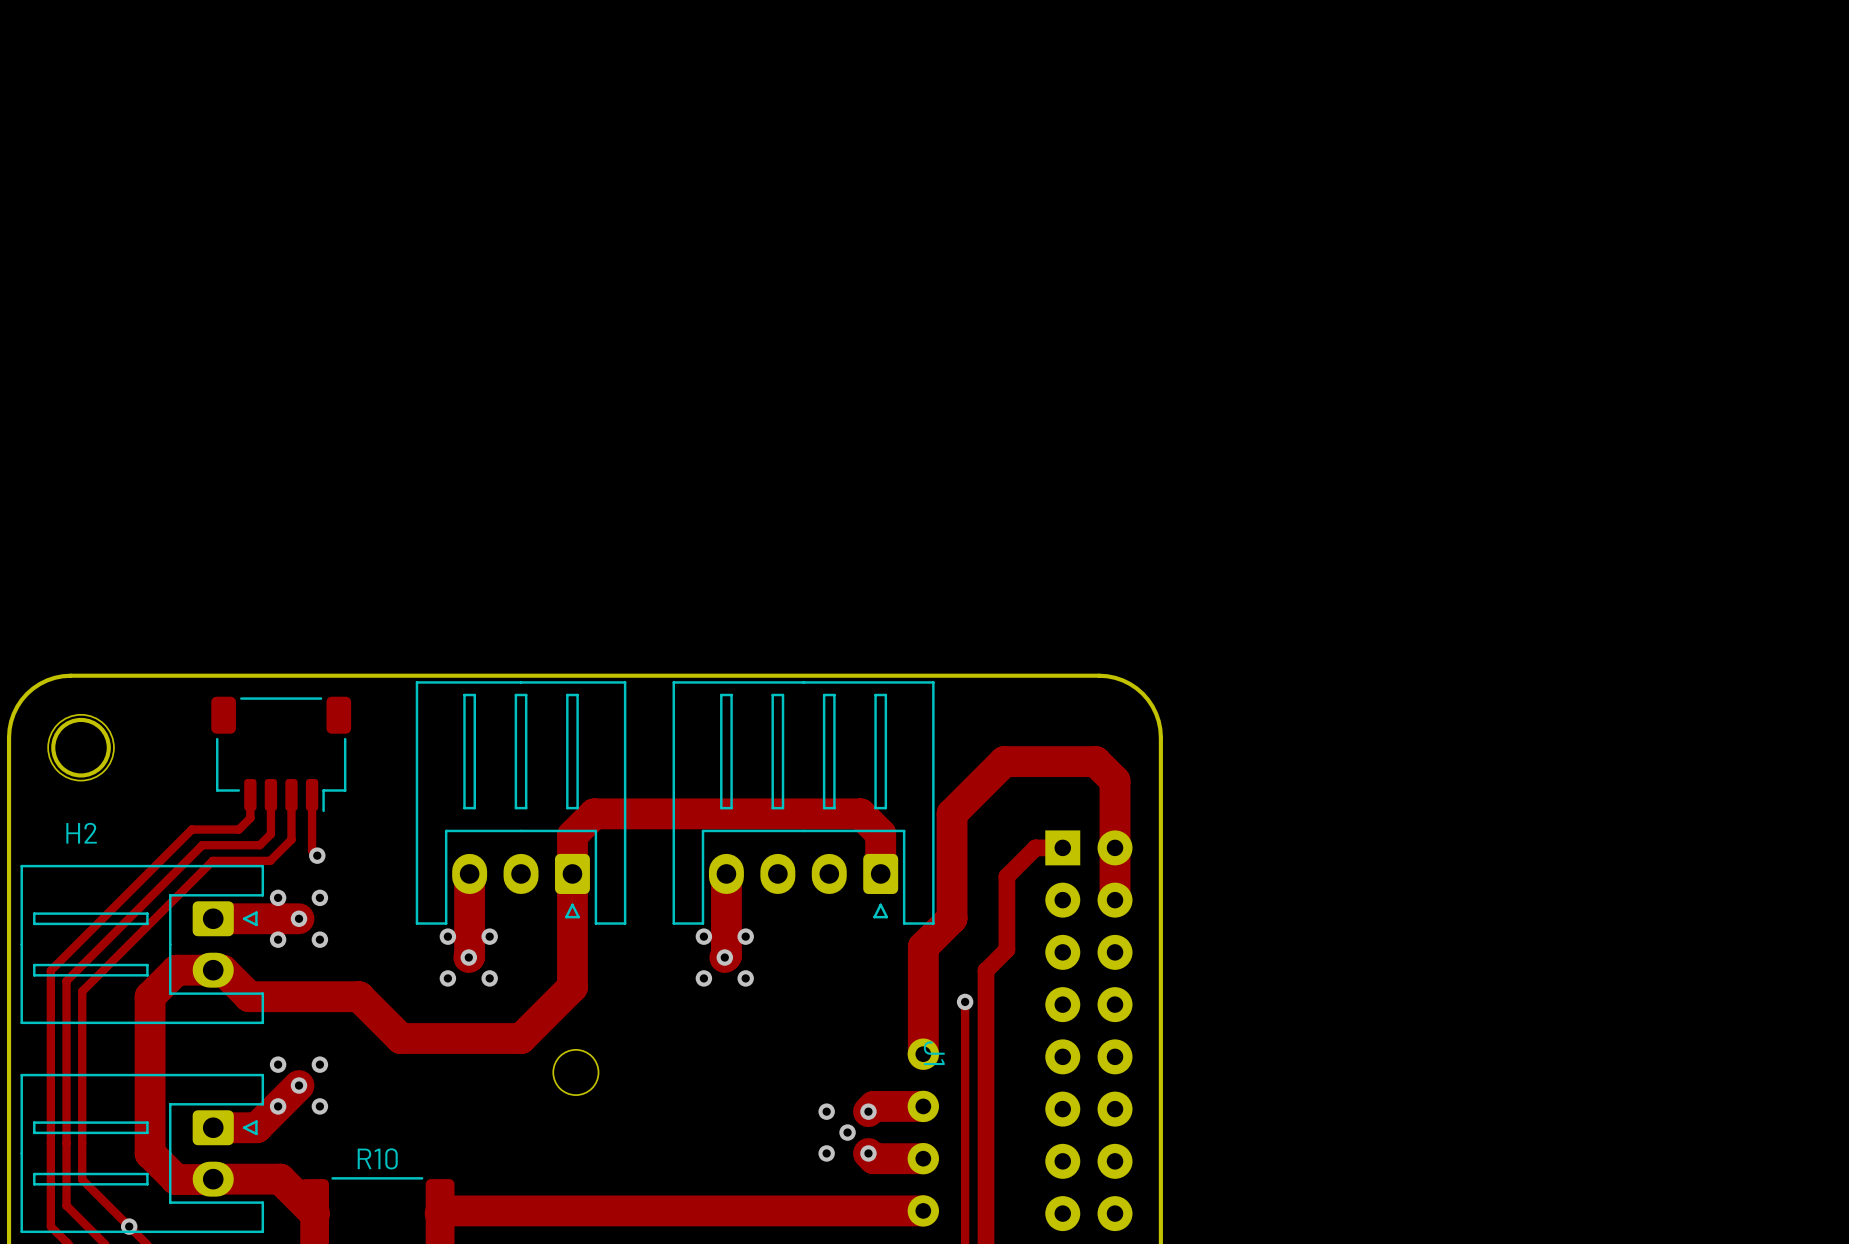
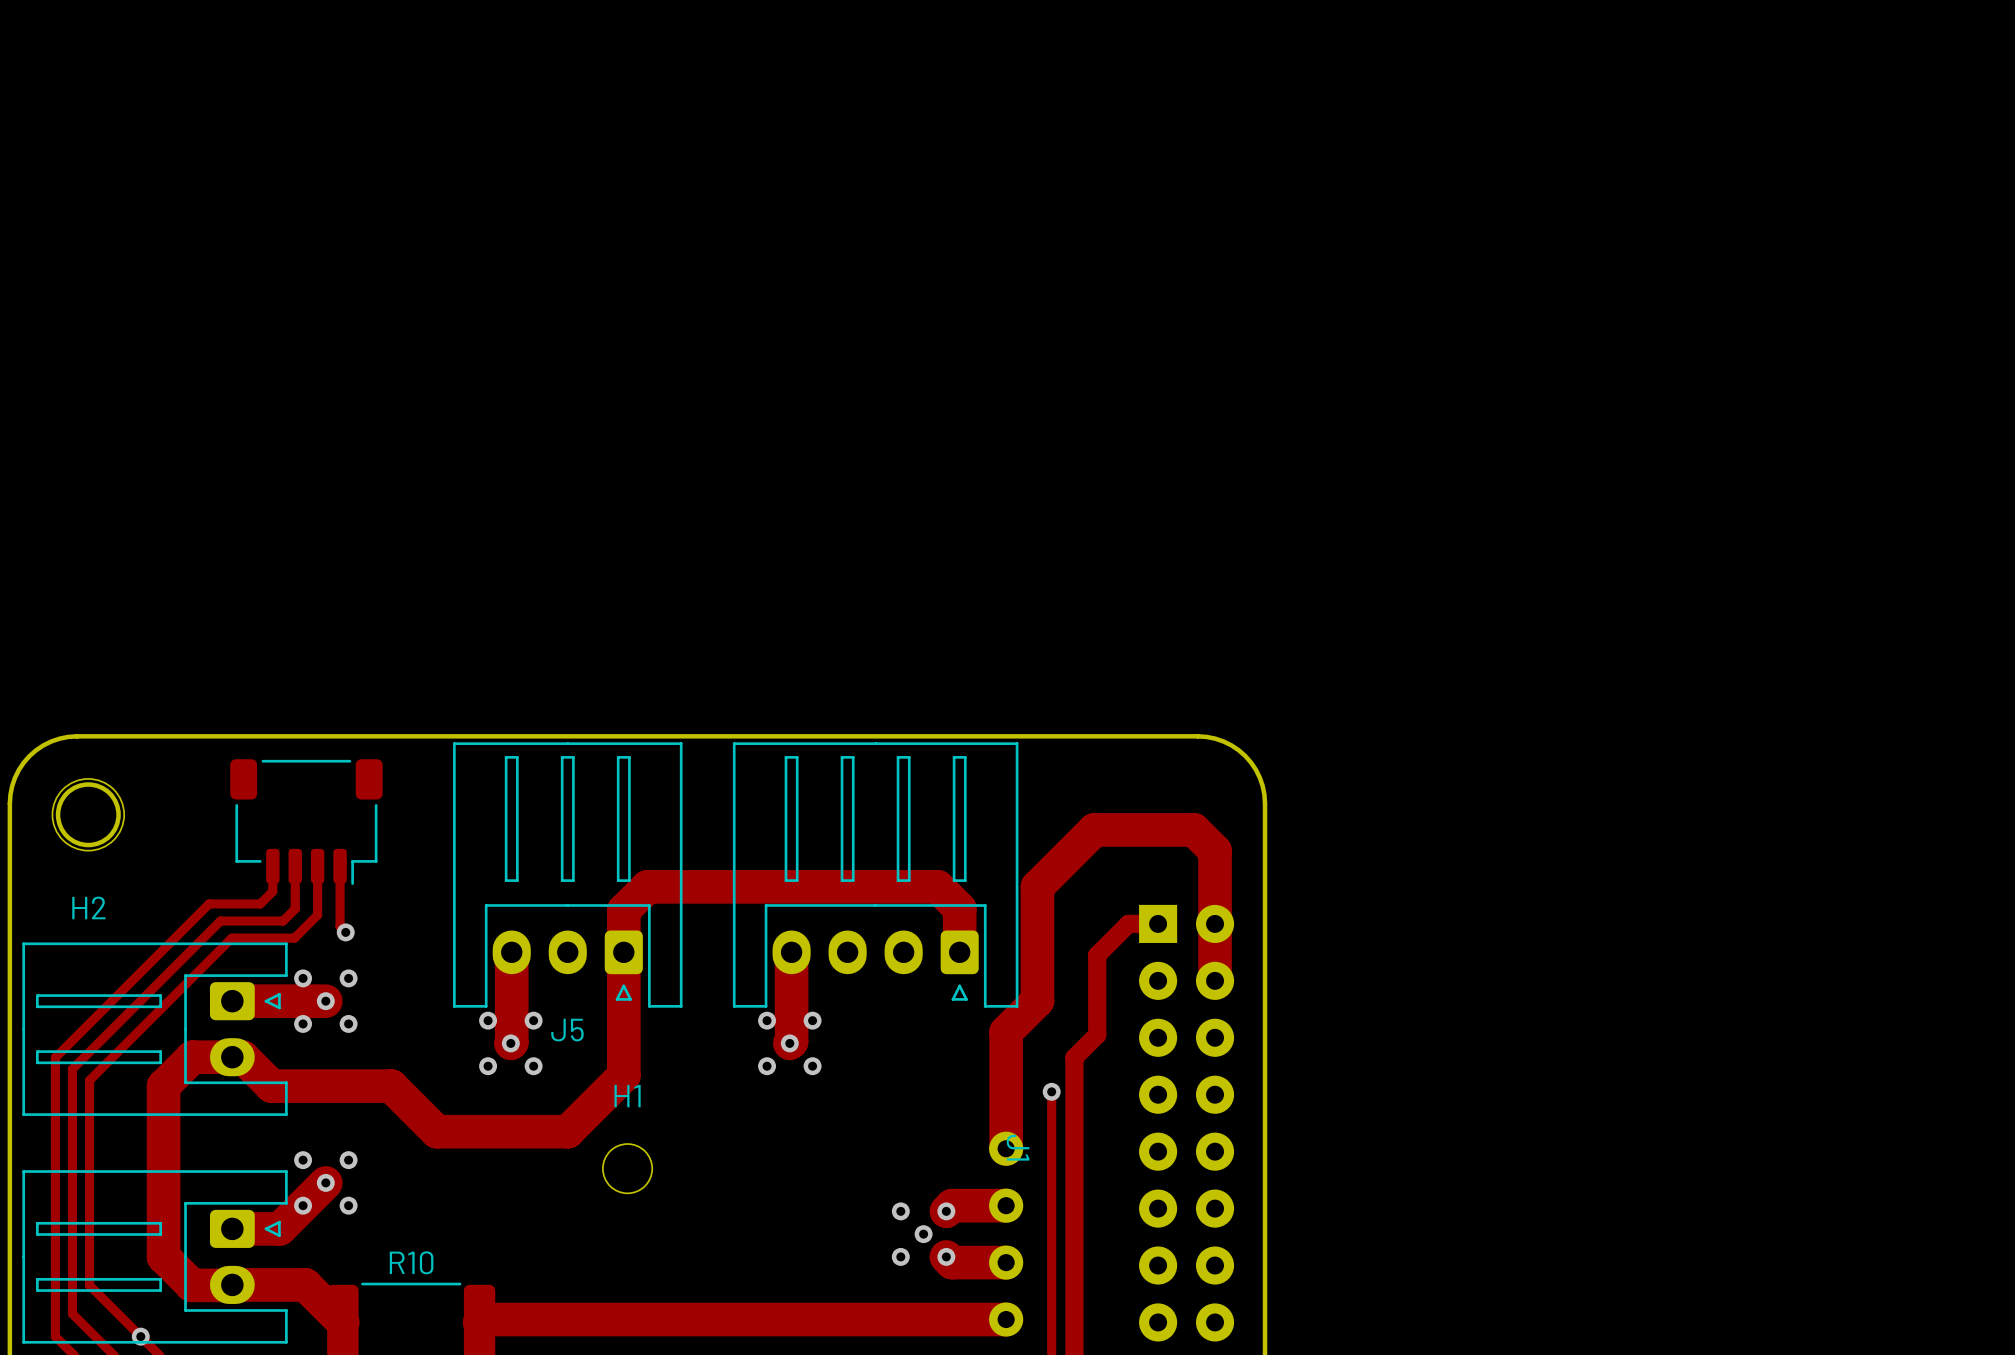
J5 name: none -> J5 (567, 1030)
H1 name: none -> H1 (627, 1096)

